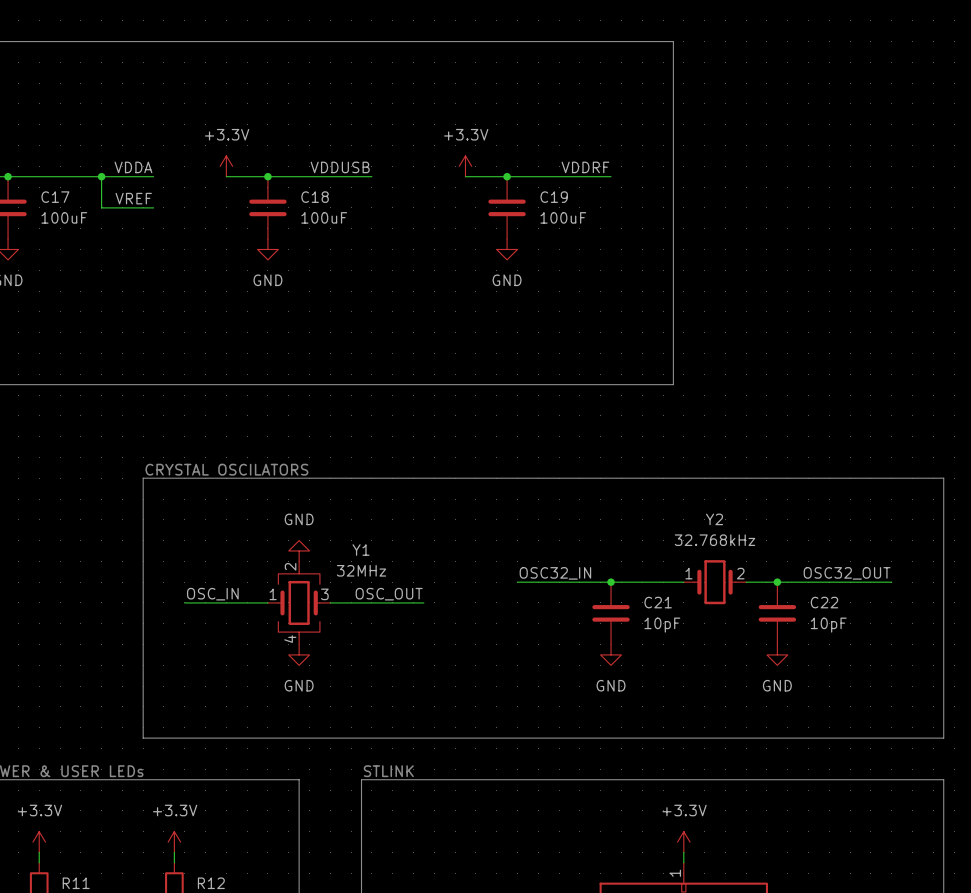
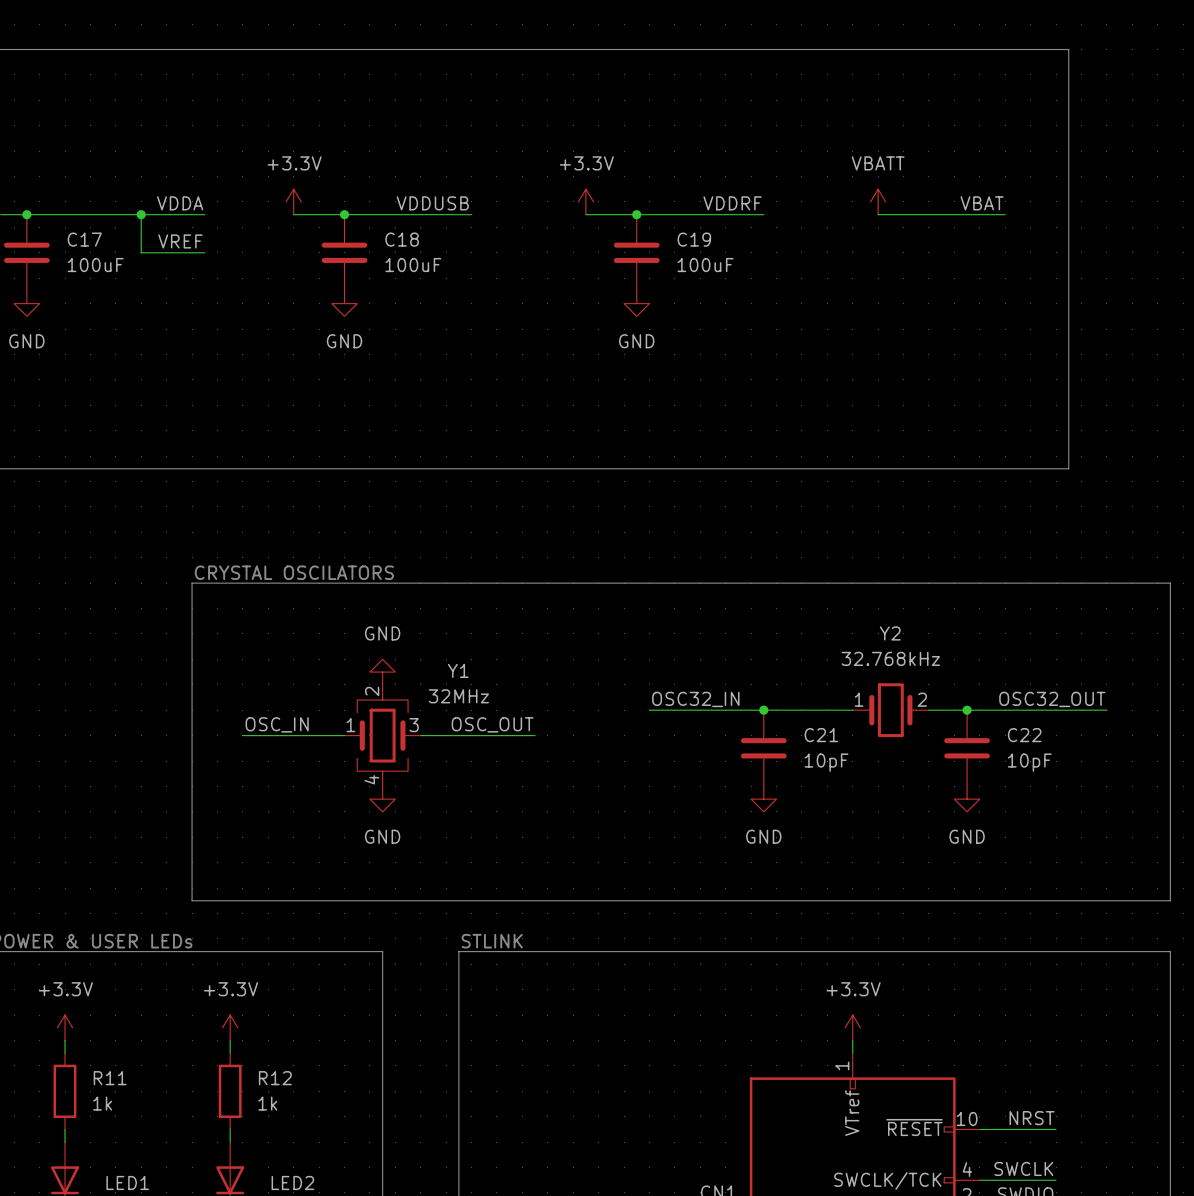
line: (673, 41) (673, 384) -> (840, 49) (1068, 49) (1068, 468) (840, 468)
power symbol: none -> VBATT (878, 201)
label: none -> VBAT (982, 203)
wire: none -> (878, 214) (1005, 214)

